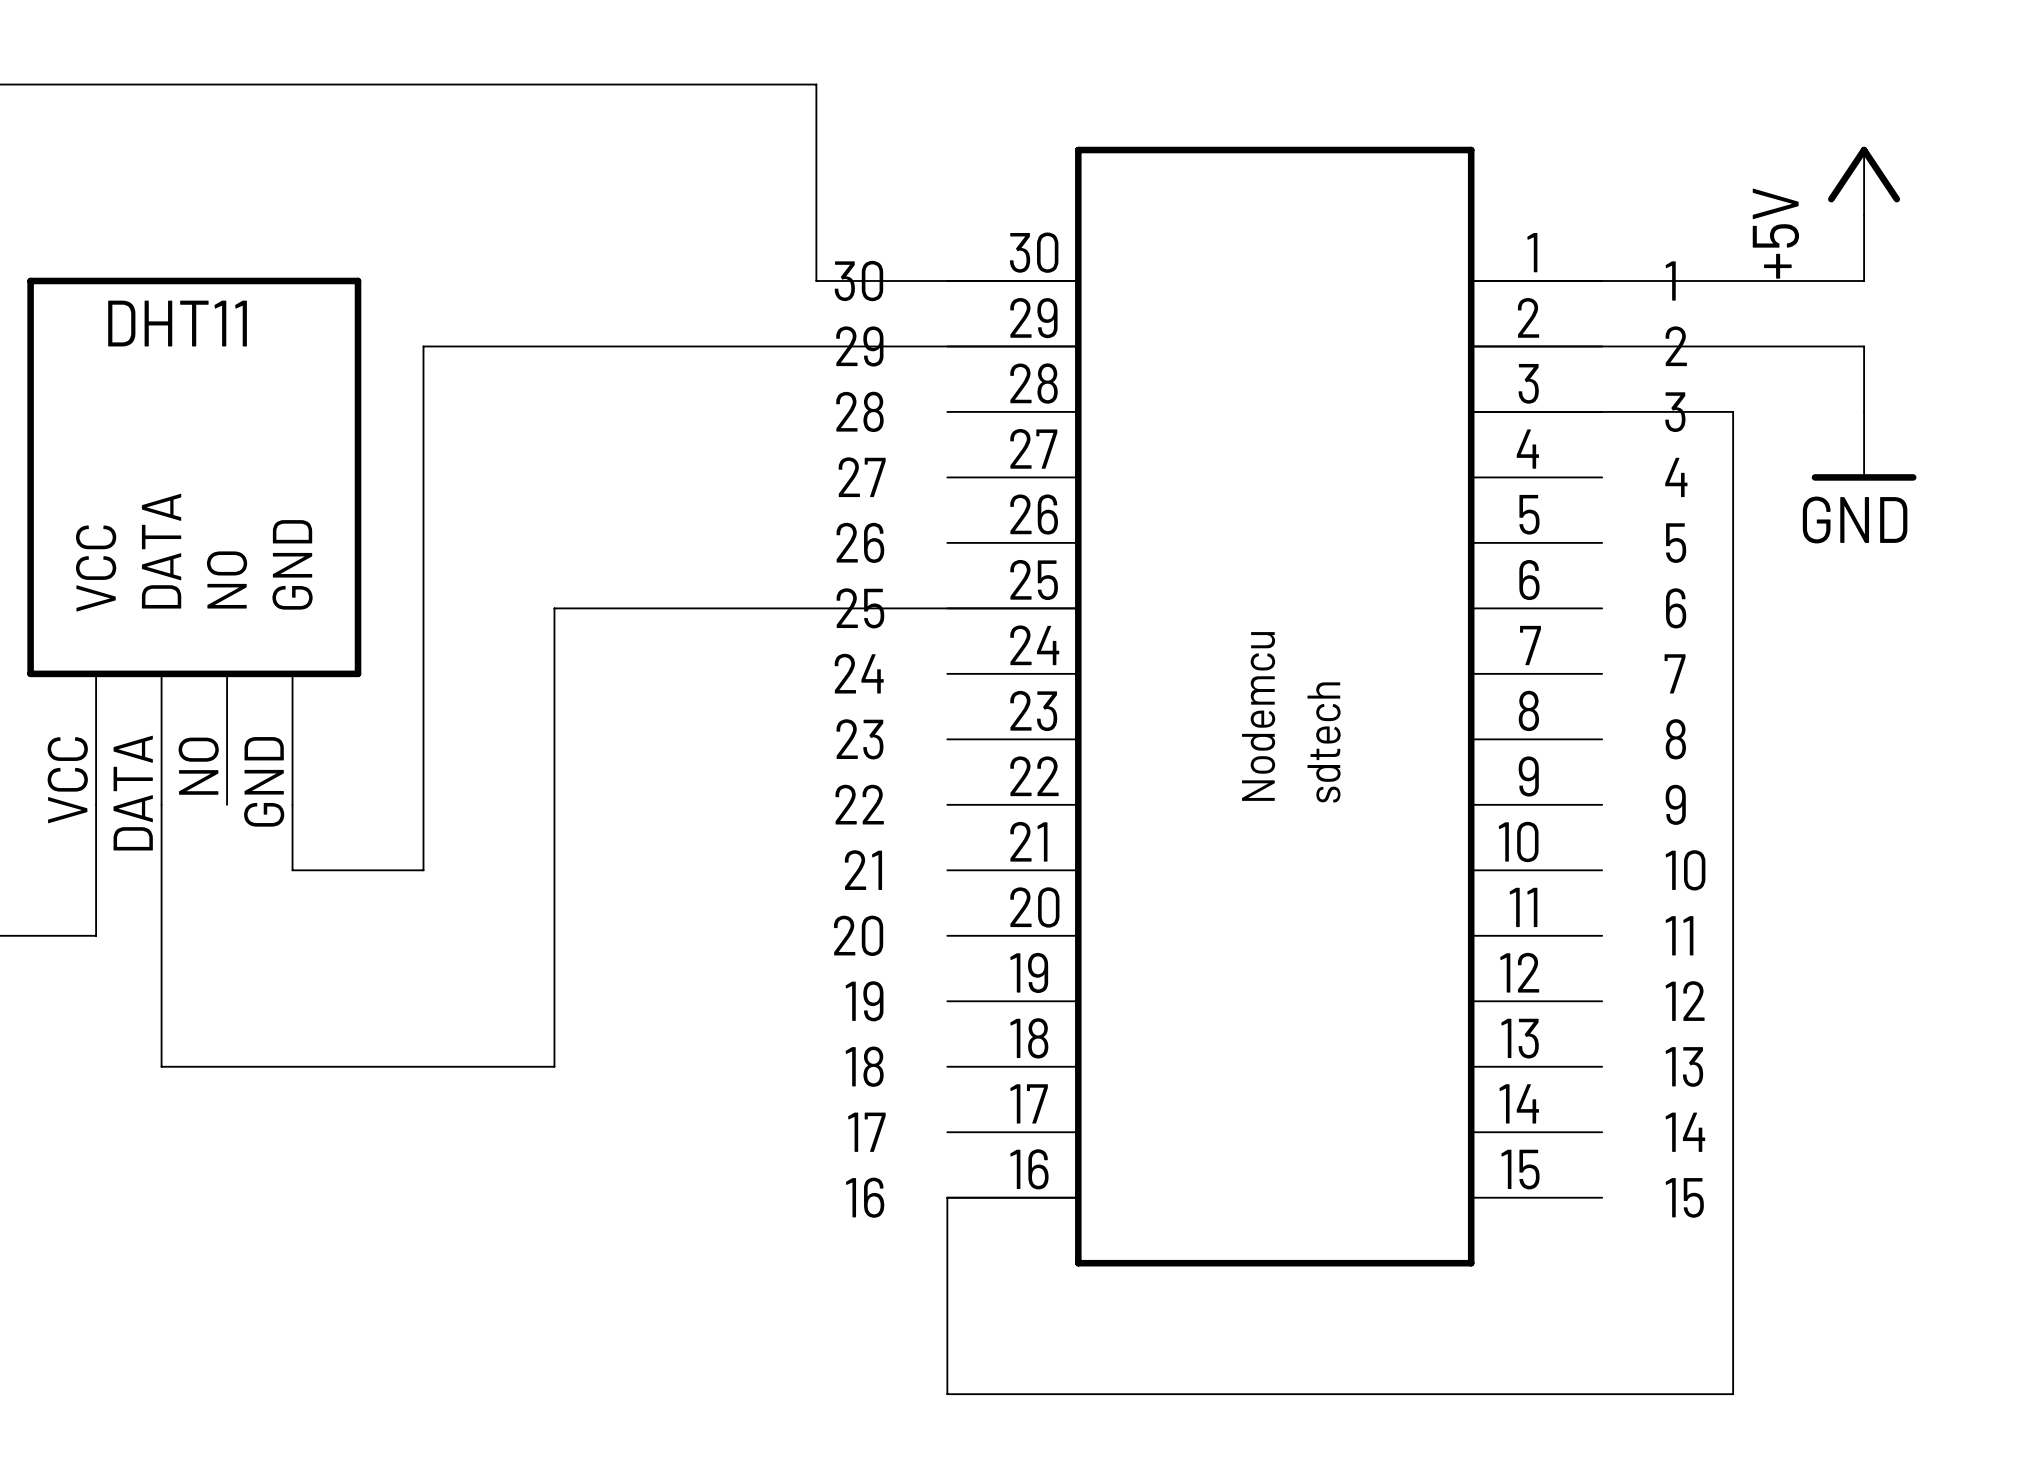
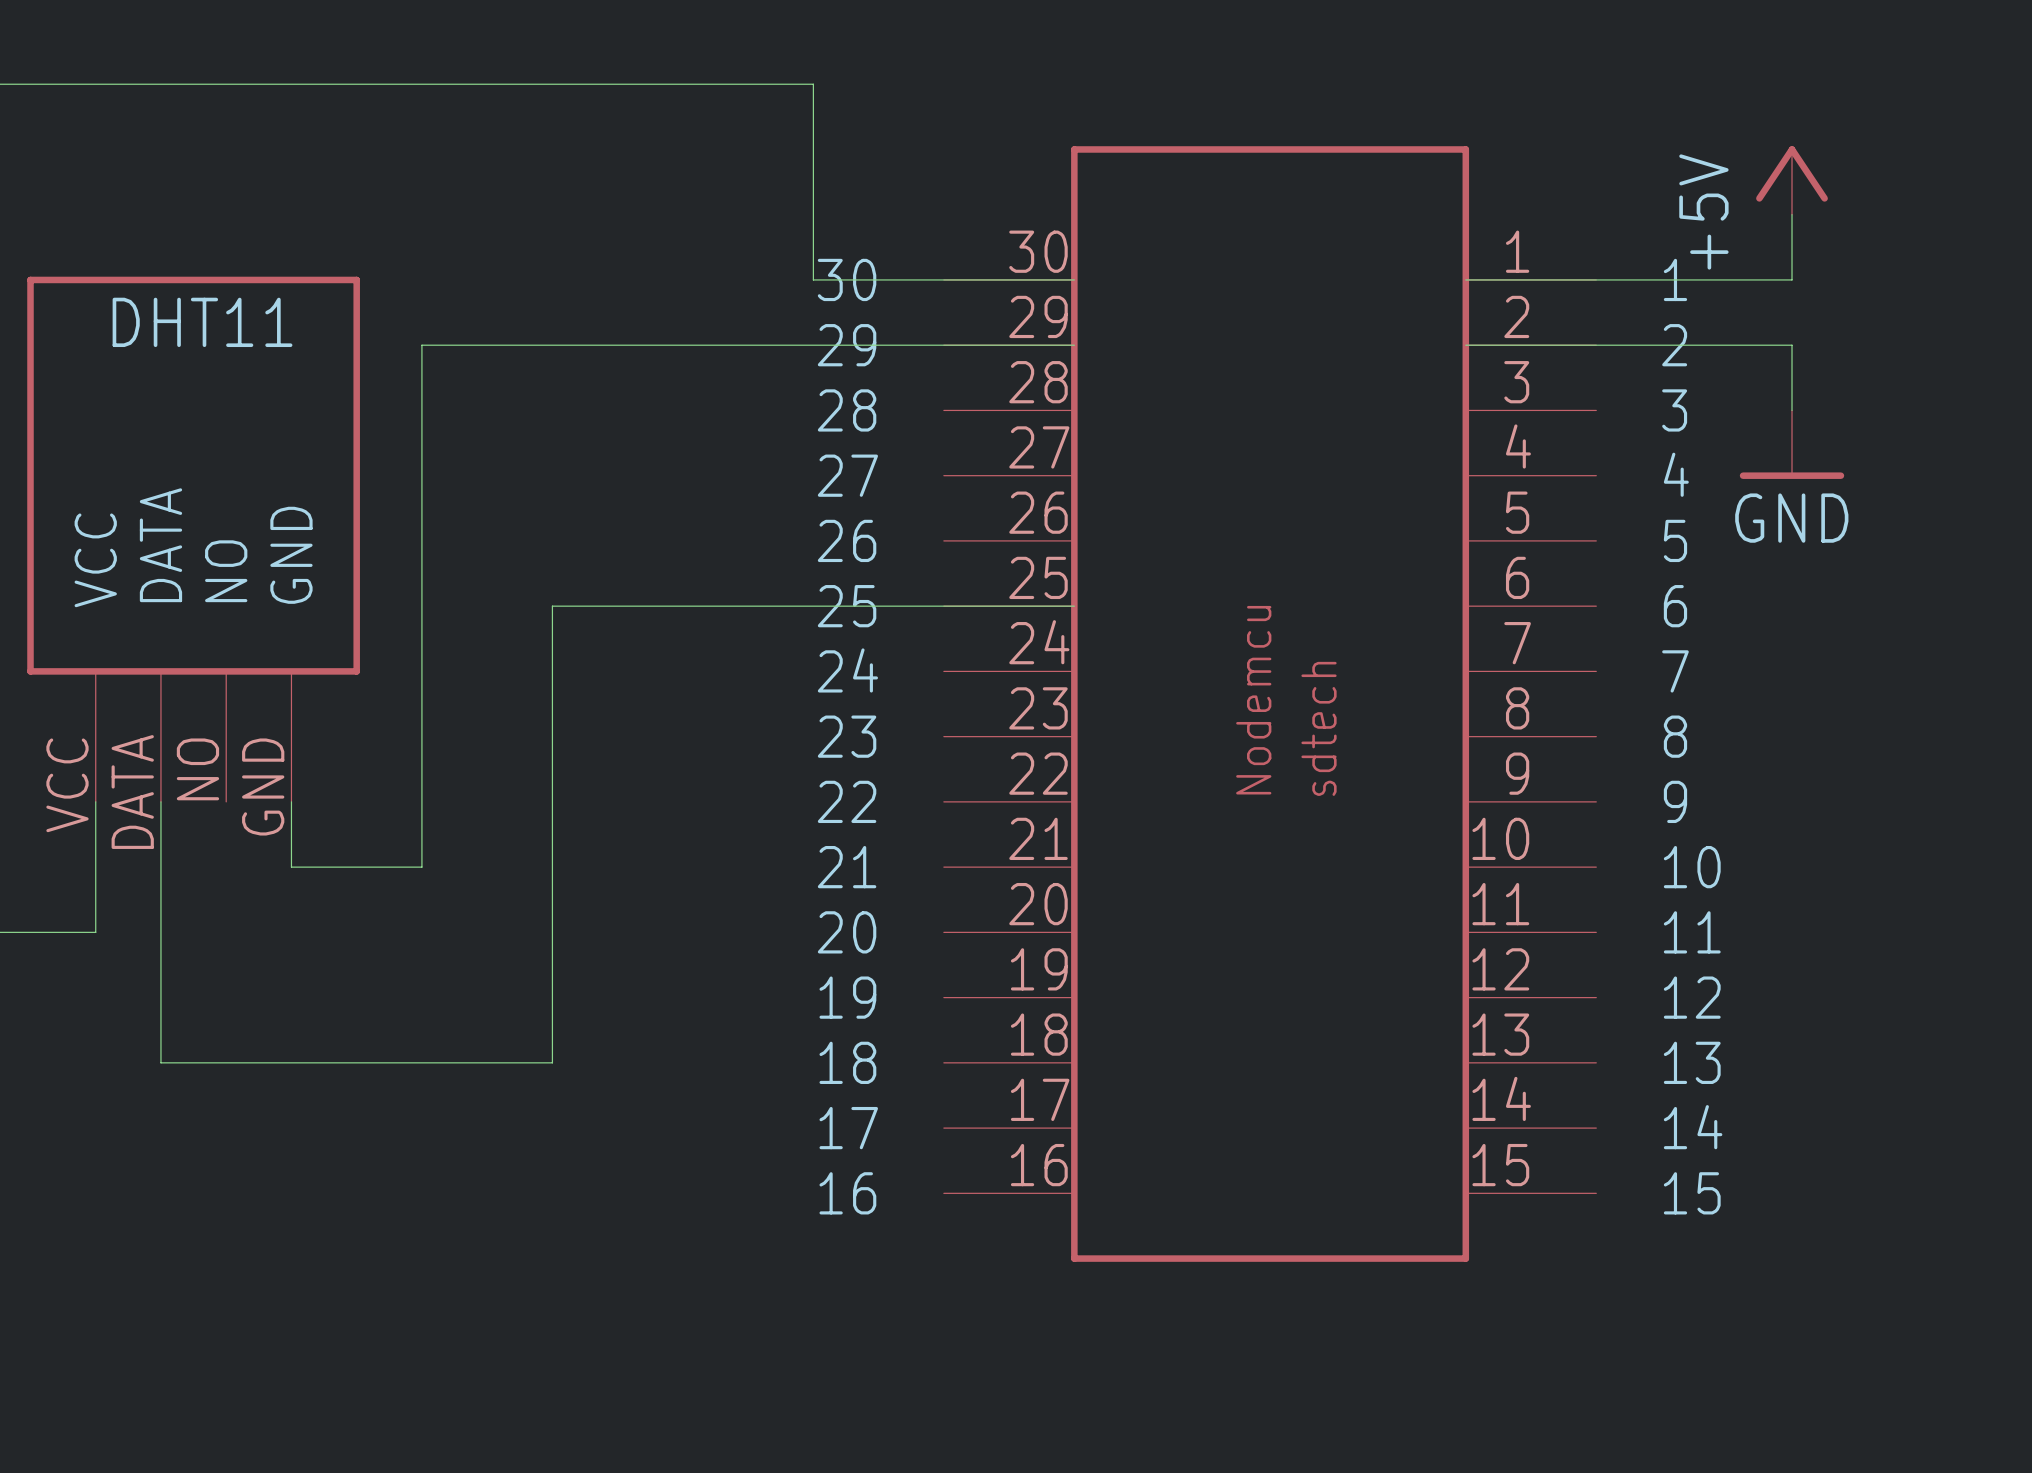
power symbol position: +5V (1864, 181) -> +5V (1792, 180)
wire: (1864, 215) (1864, 280) (1798, 280) -> (1792, 214) (1792, 279)
wire: (1798, 346) (1864, 346) (1864, 411) -> (1792, 345) (1792, 410)
wire: (1471, 411) (1733, 411) (1733, 1394) (947, 1394) (947, 1197) (1078, 1197) -> none
power symbol position: GND (1864, 446) -> GND (1792, 444)

